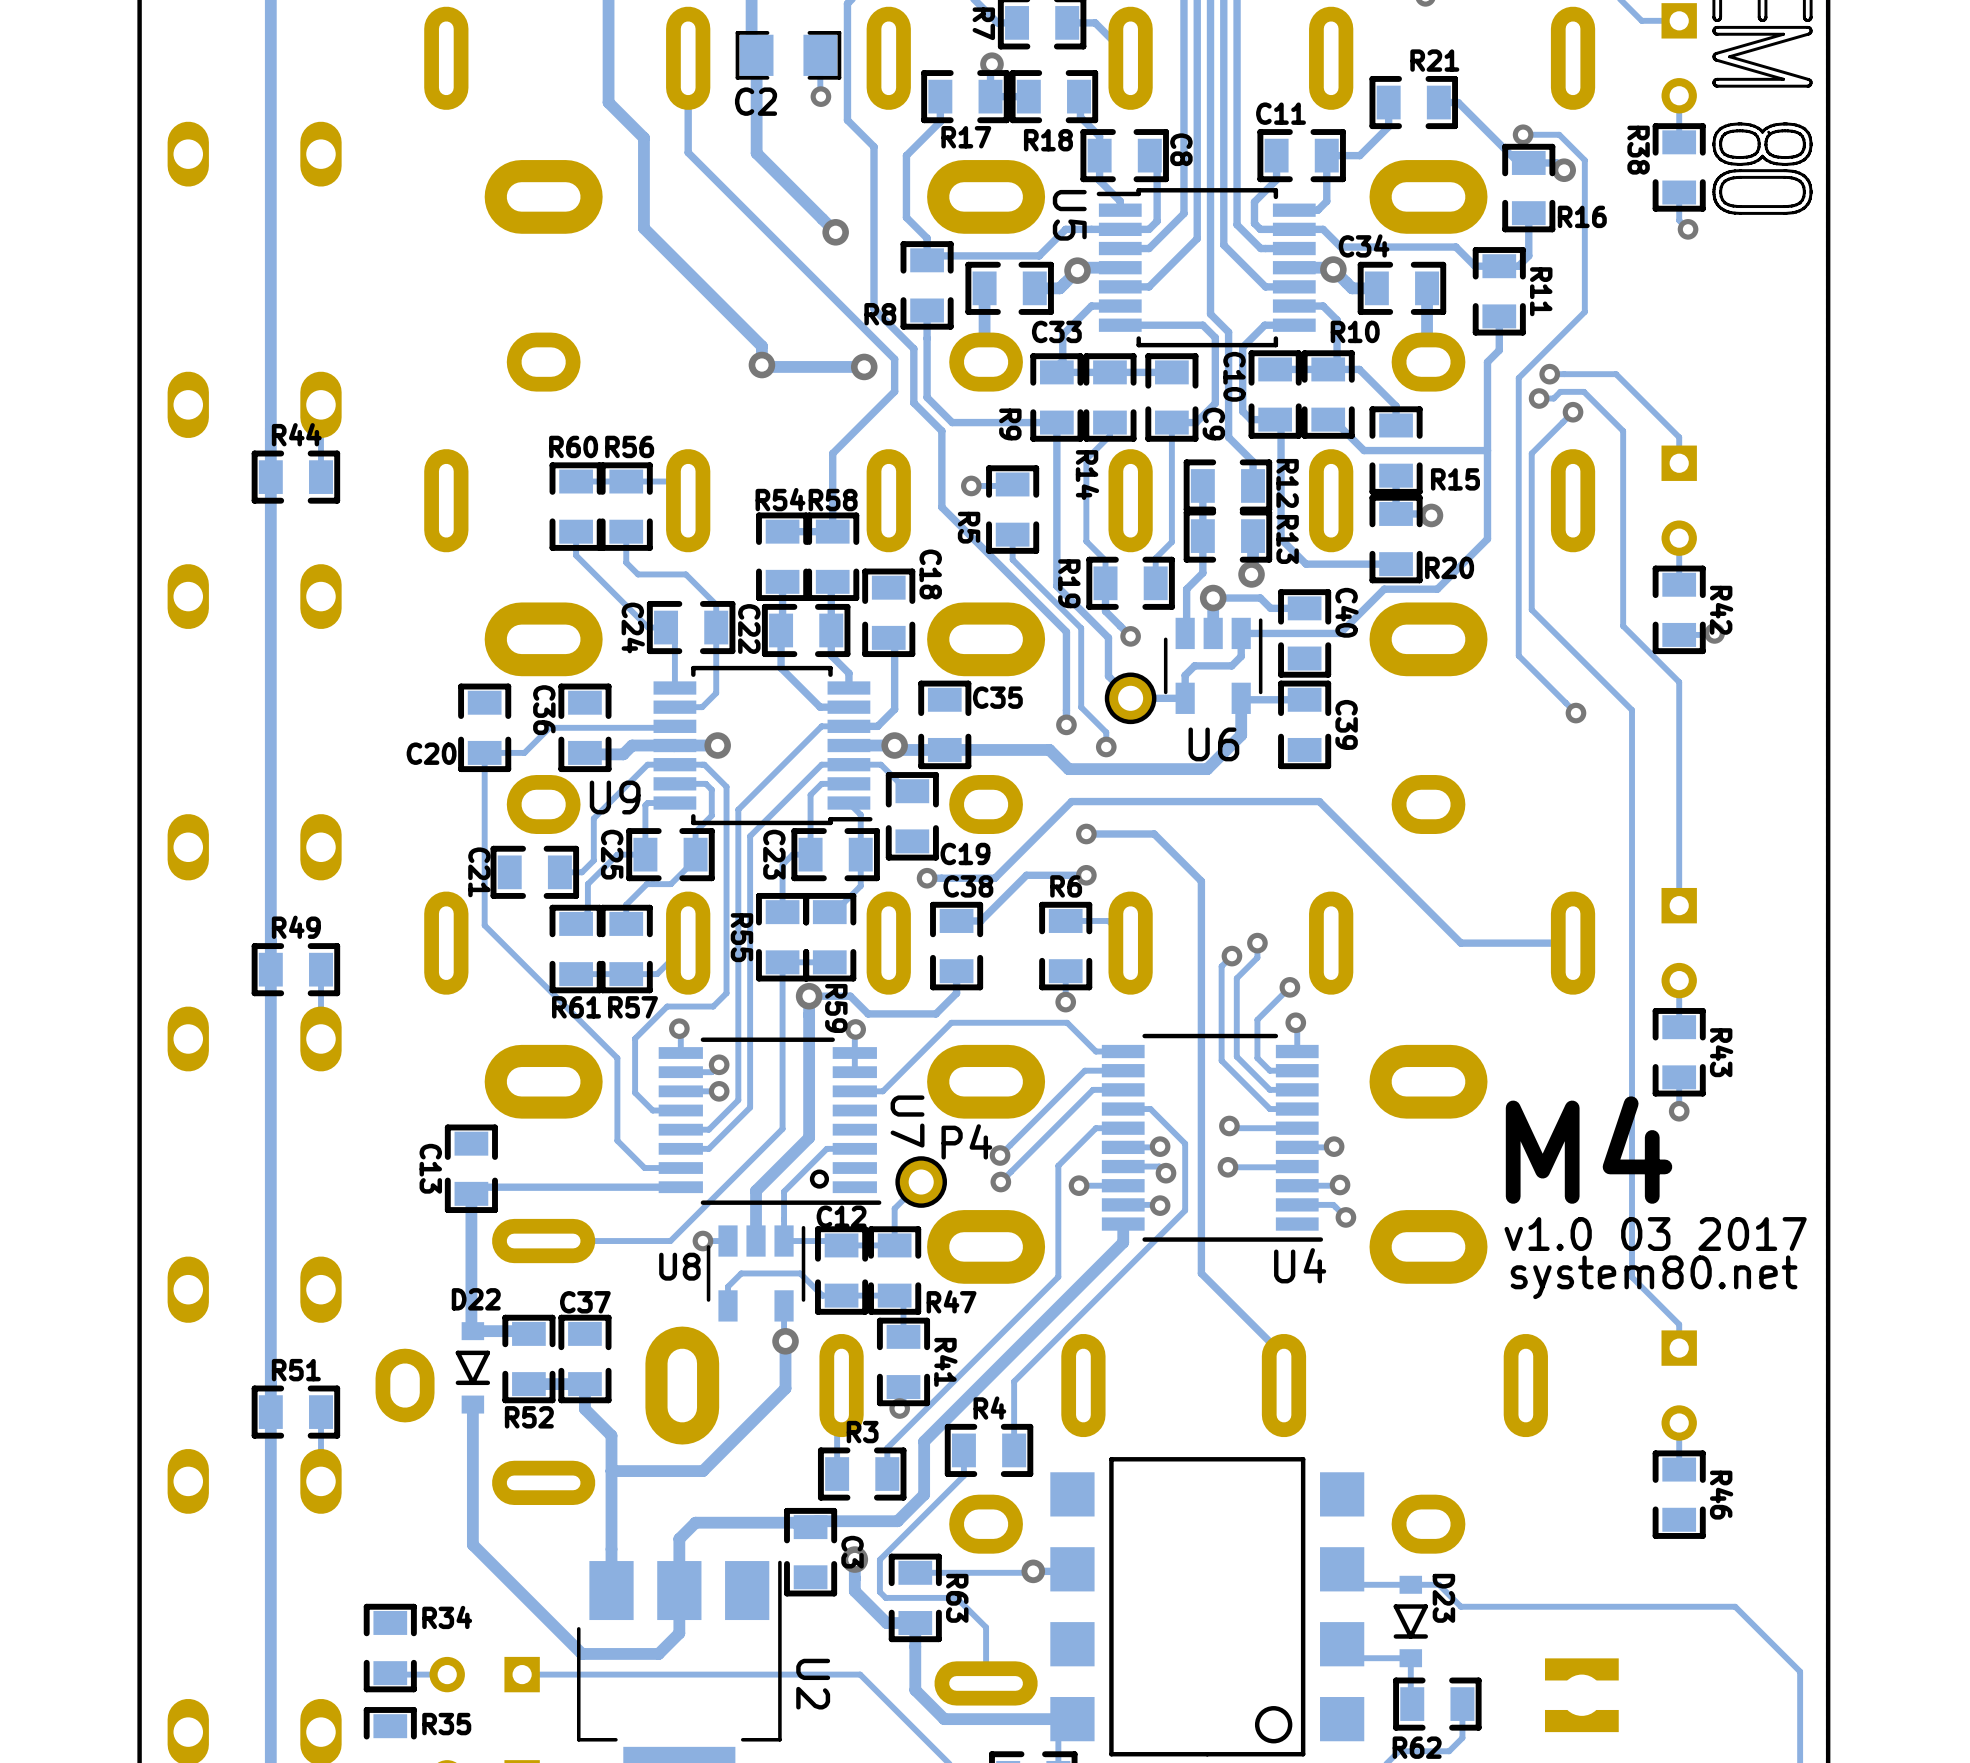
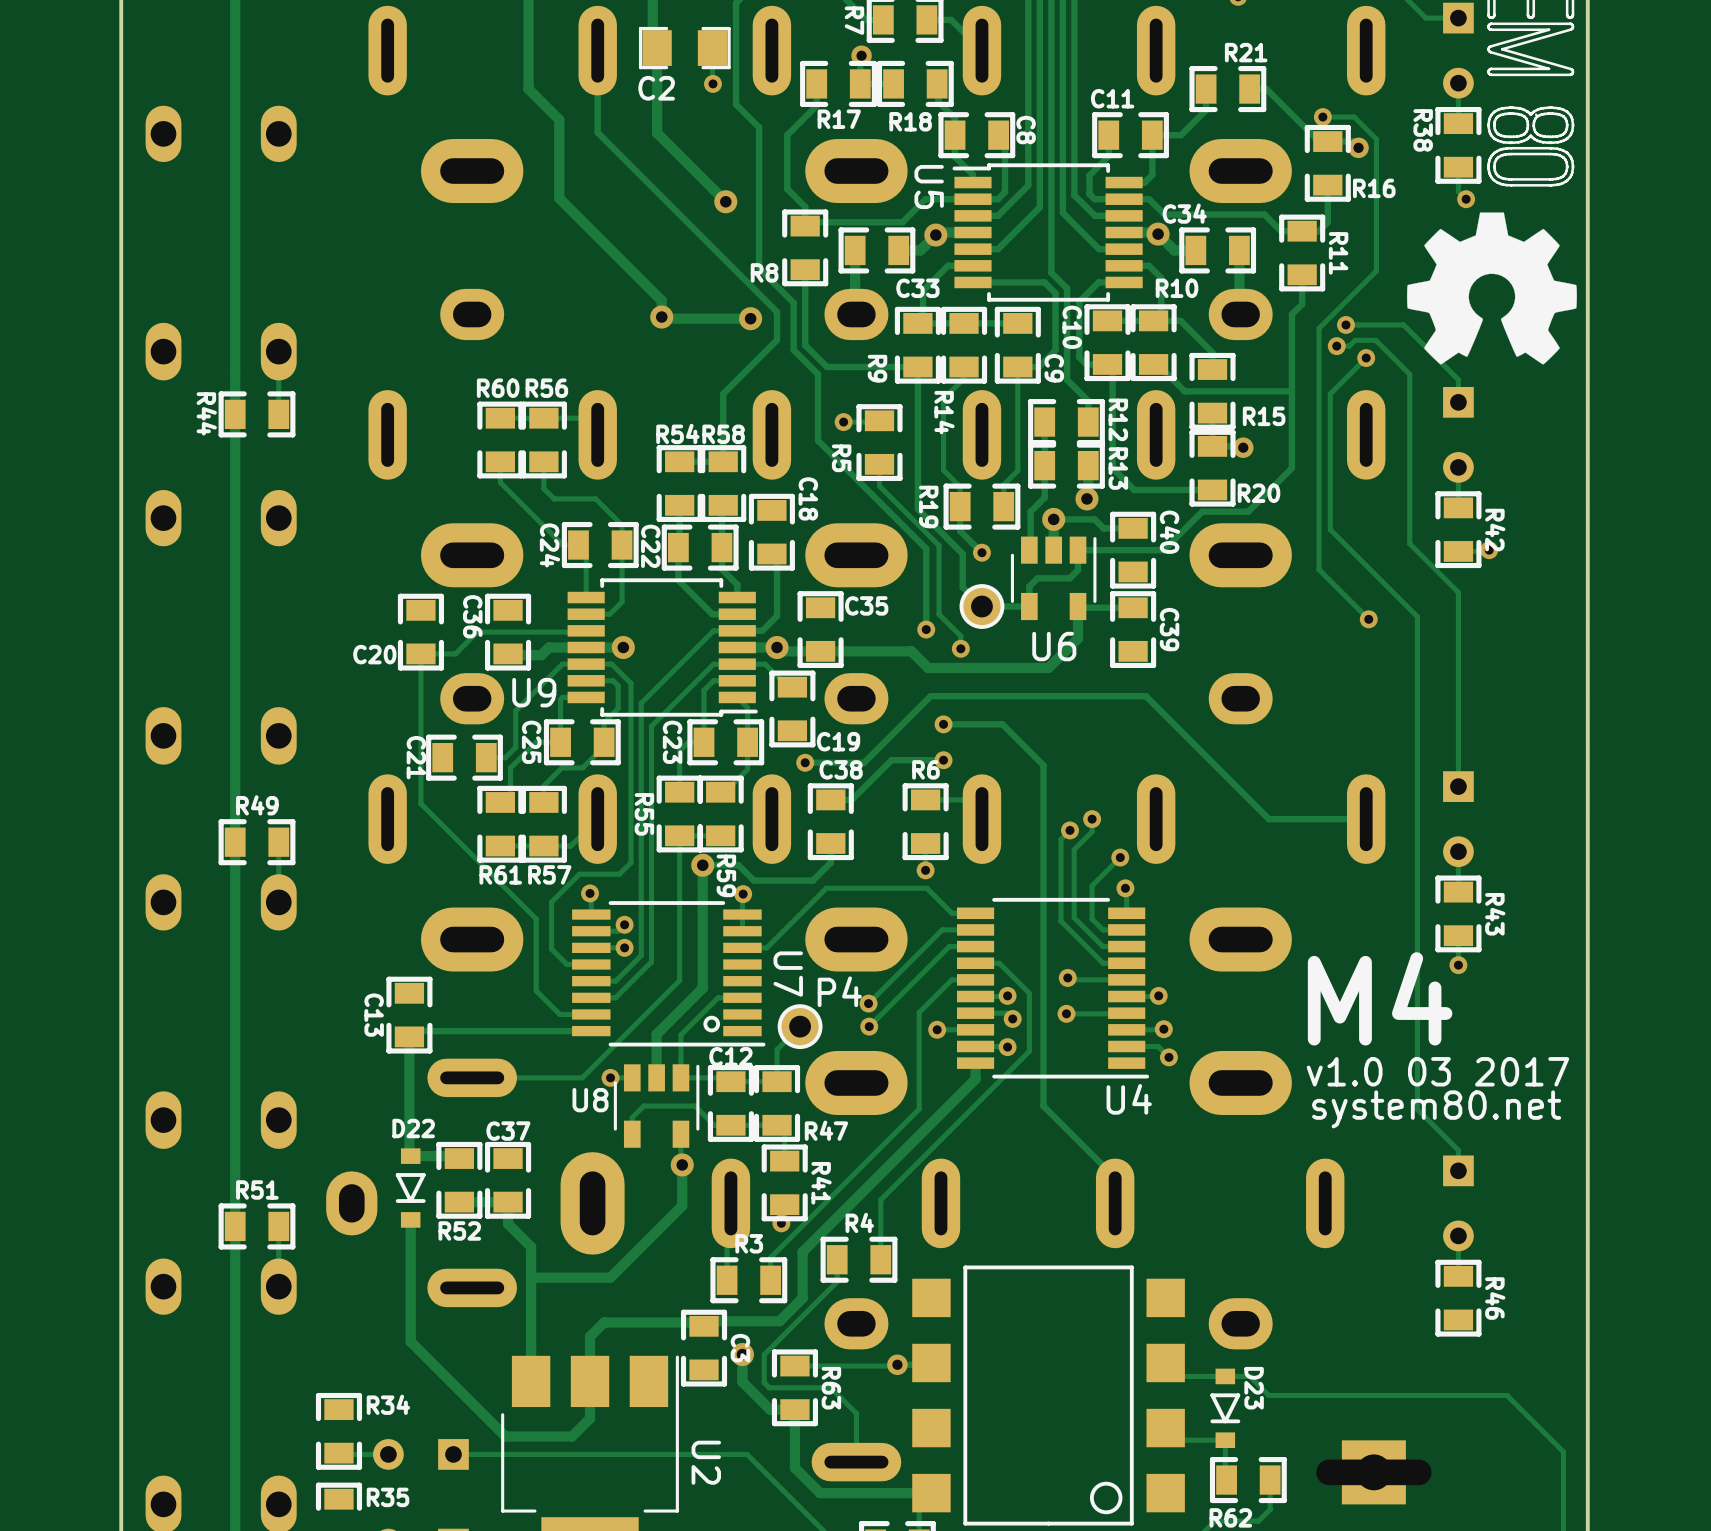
drawing: none -> [1407, 212, 1577, 365]
R44 name rotation: 0° (296, 434) -> 90° clockwise (206, 413)
R44 name position: R44 (296, 434) -> R44 (206, 413)

